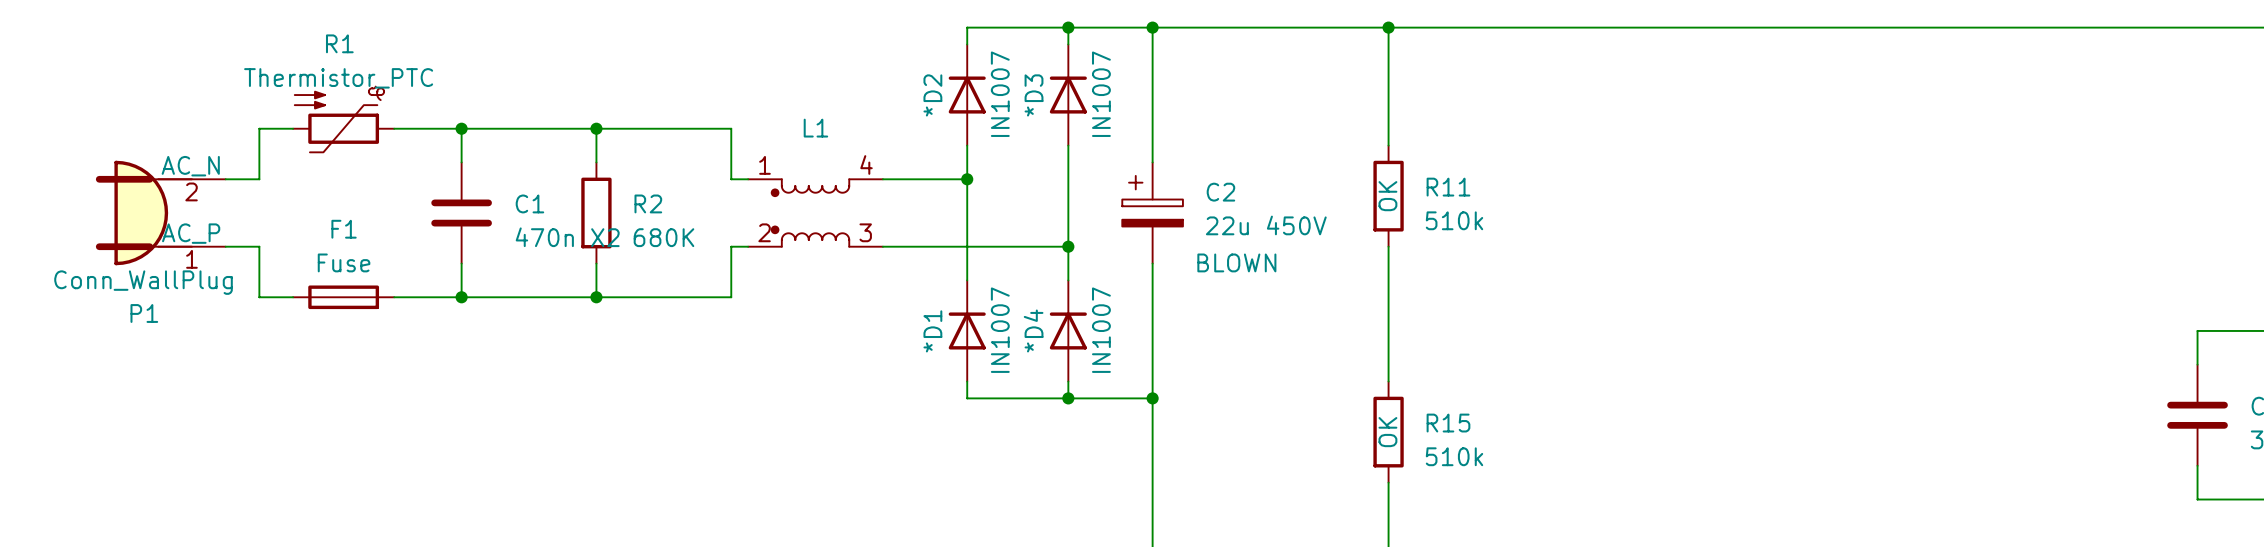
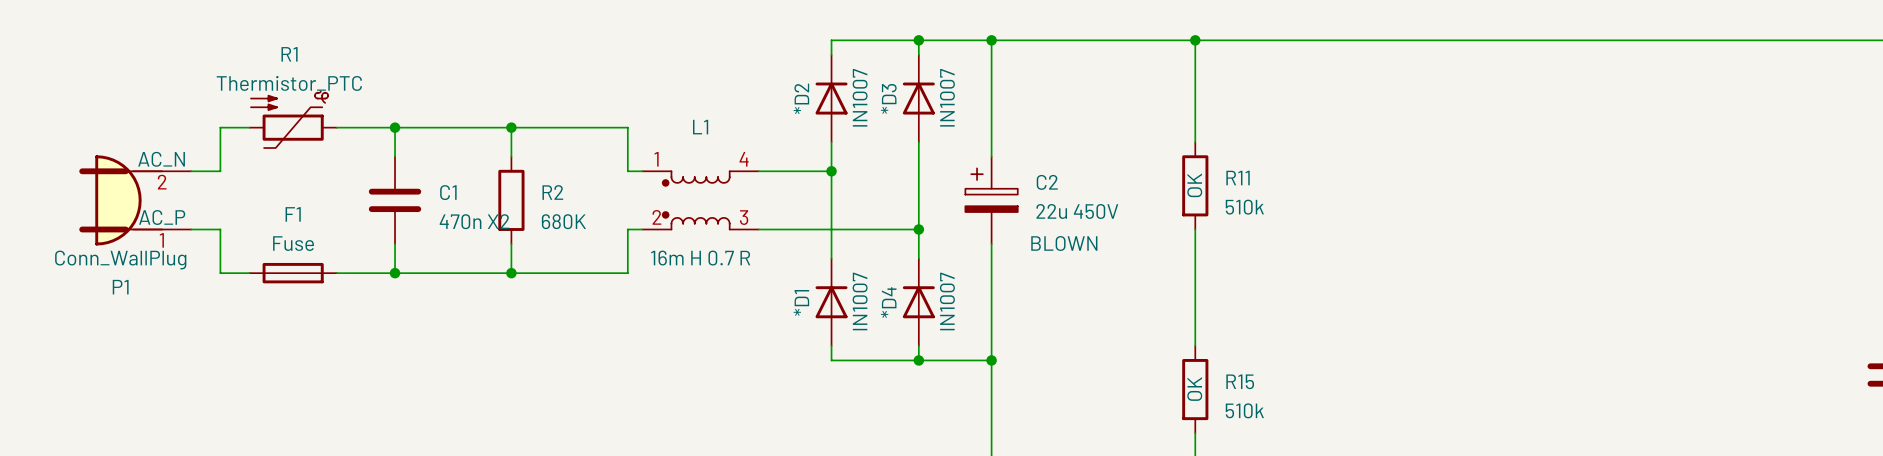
L1 value: none -> 16m H 0.7 R (700, 258)

